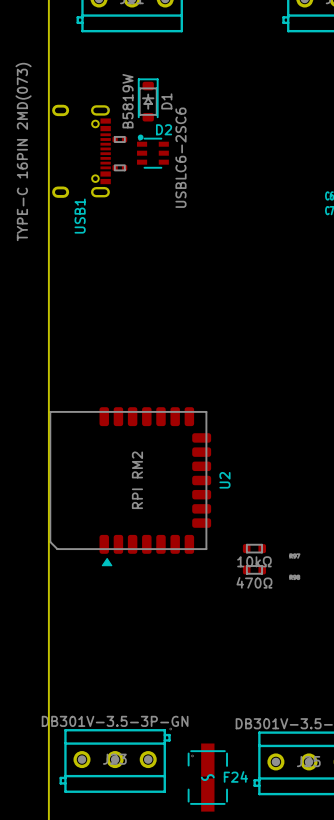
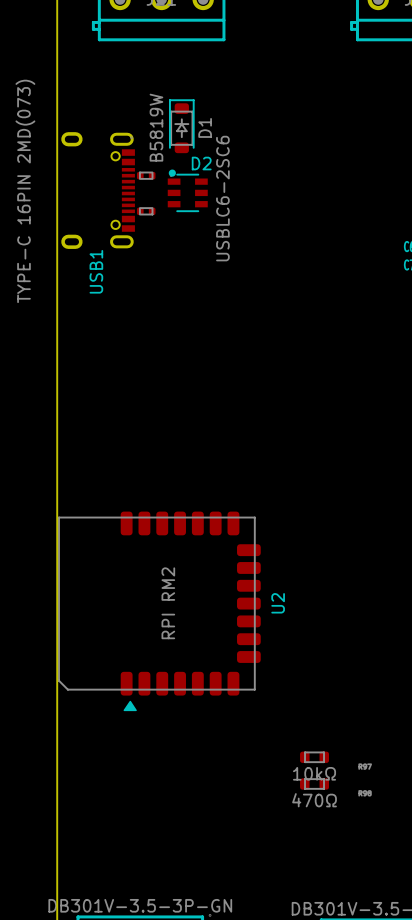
part position: (254, 548) -> (314, 757)
part position: (254, 569) -> (314, 783)

